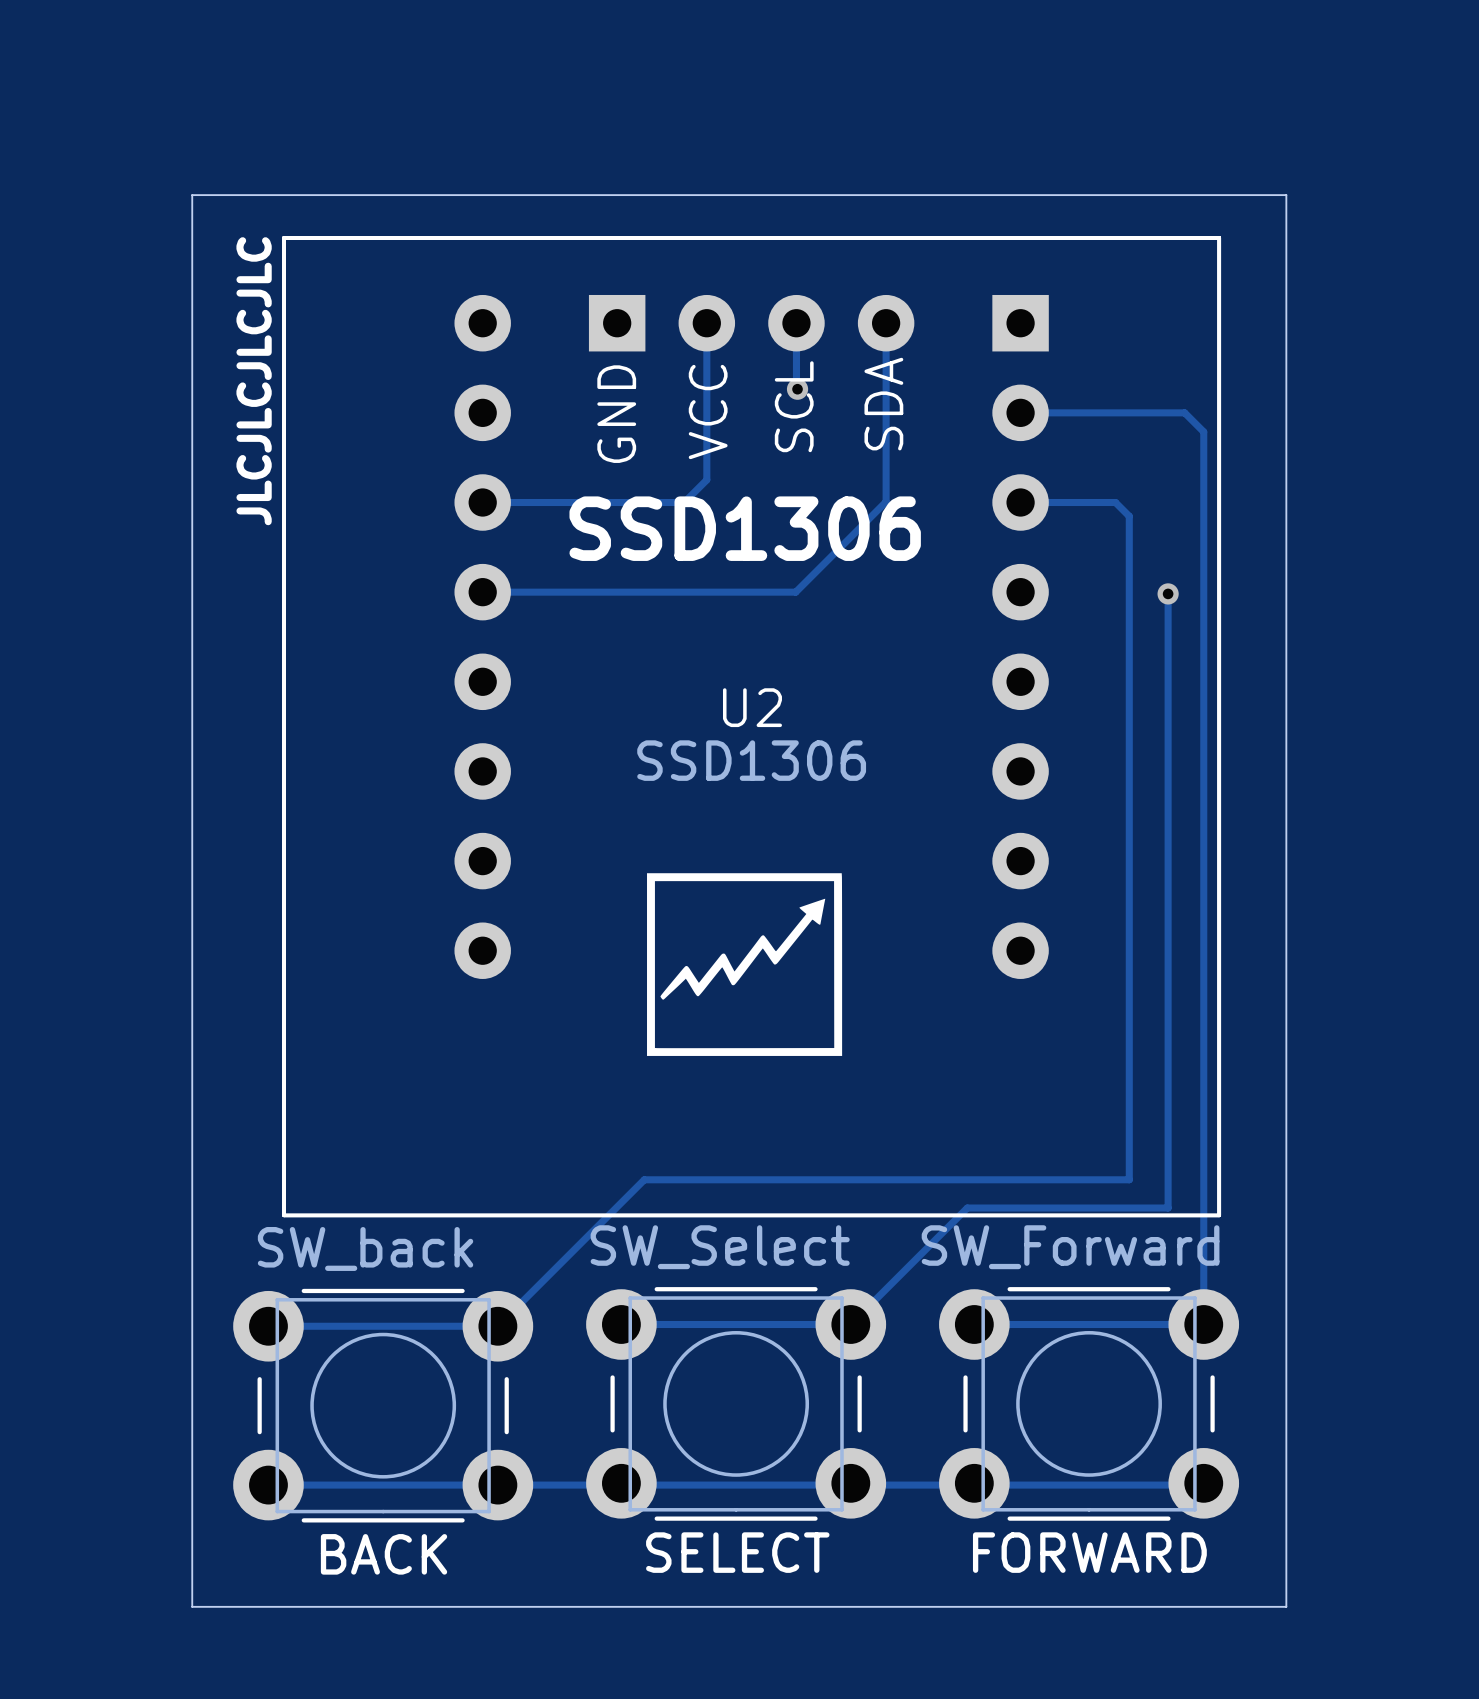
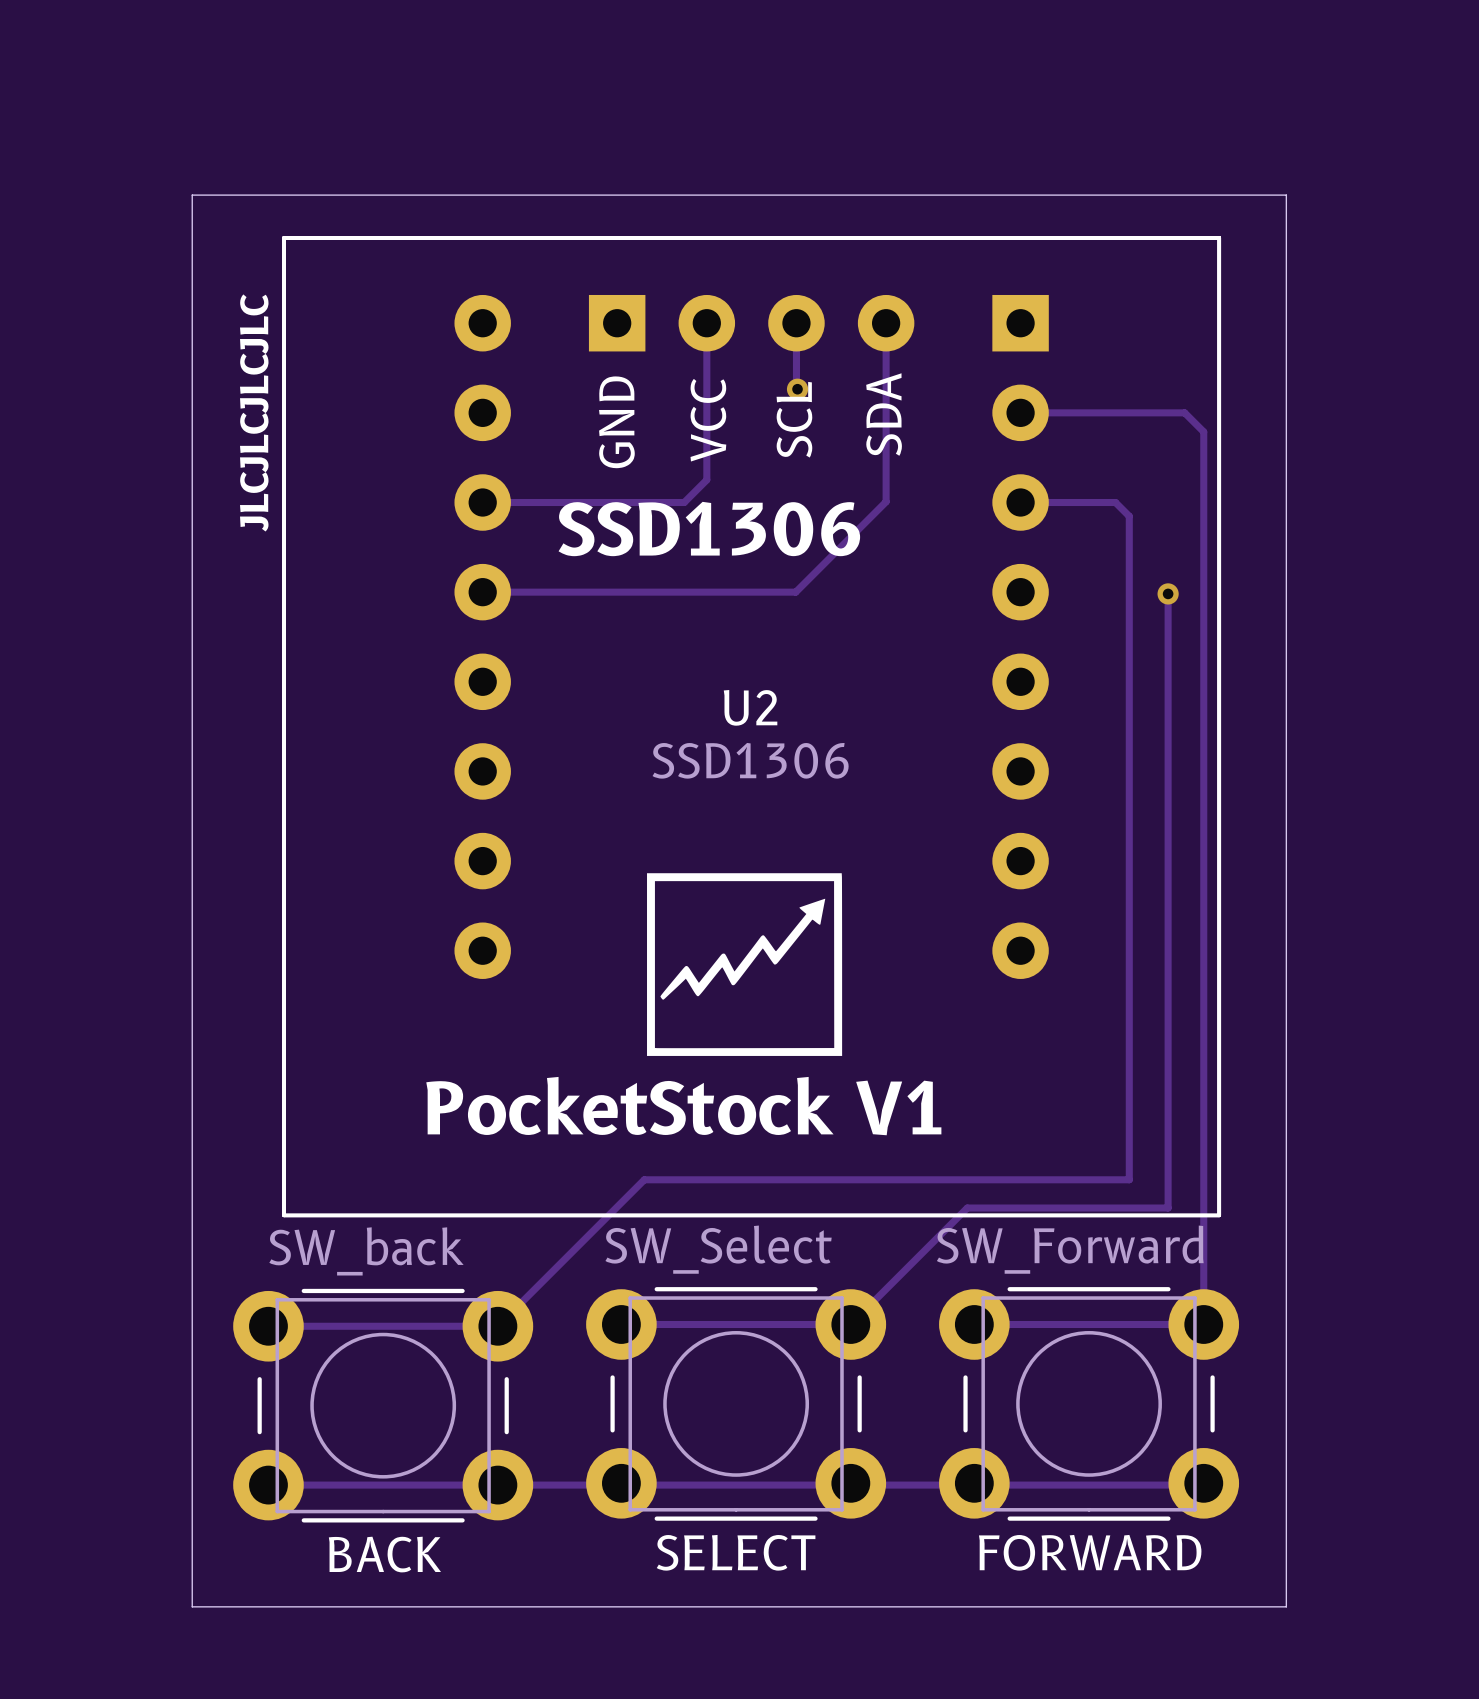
text: none -> PocketStock V1 (683, 1106)

